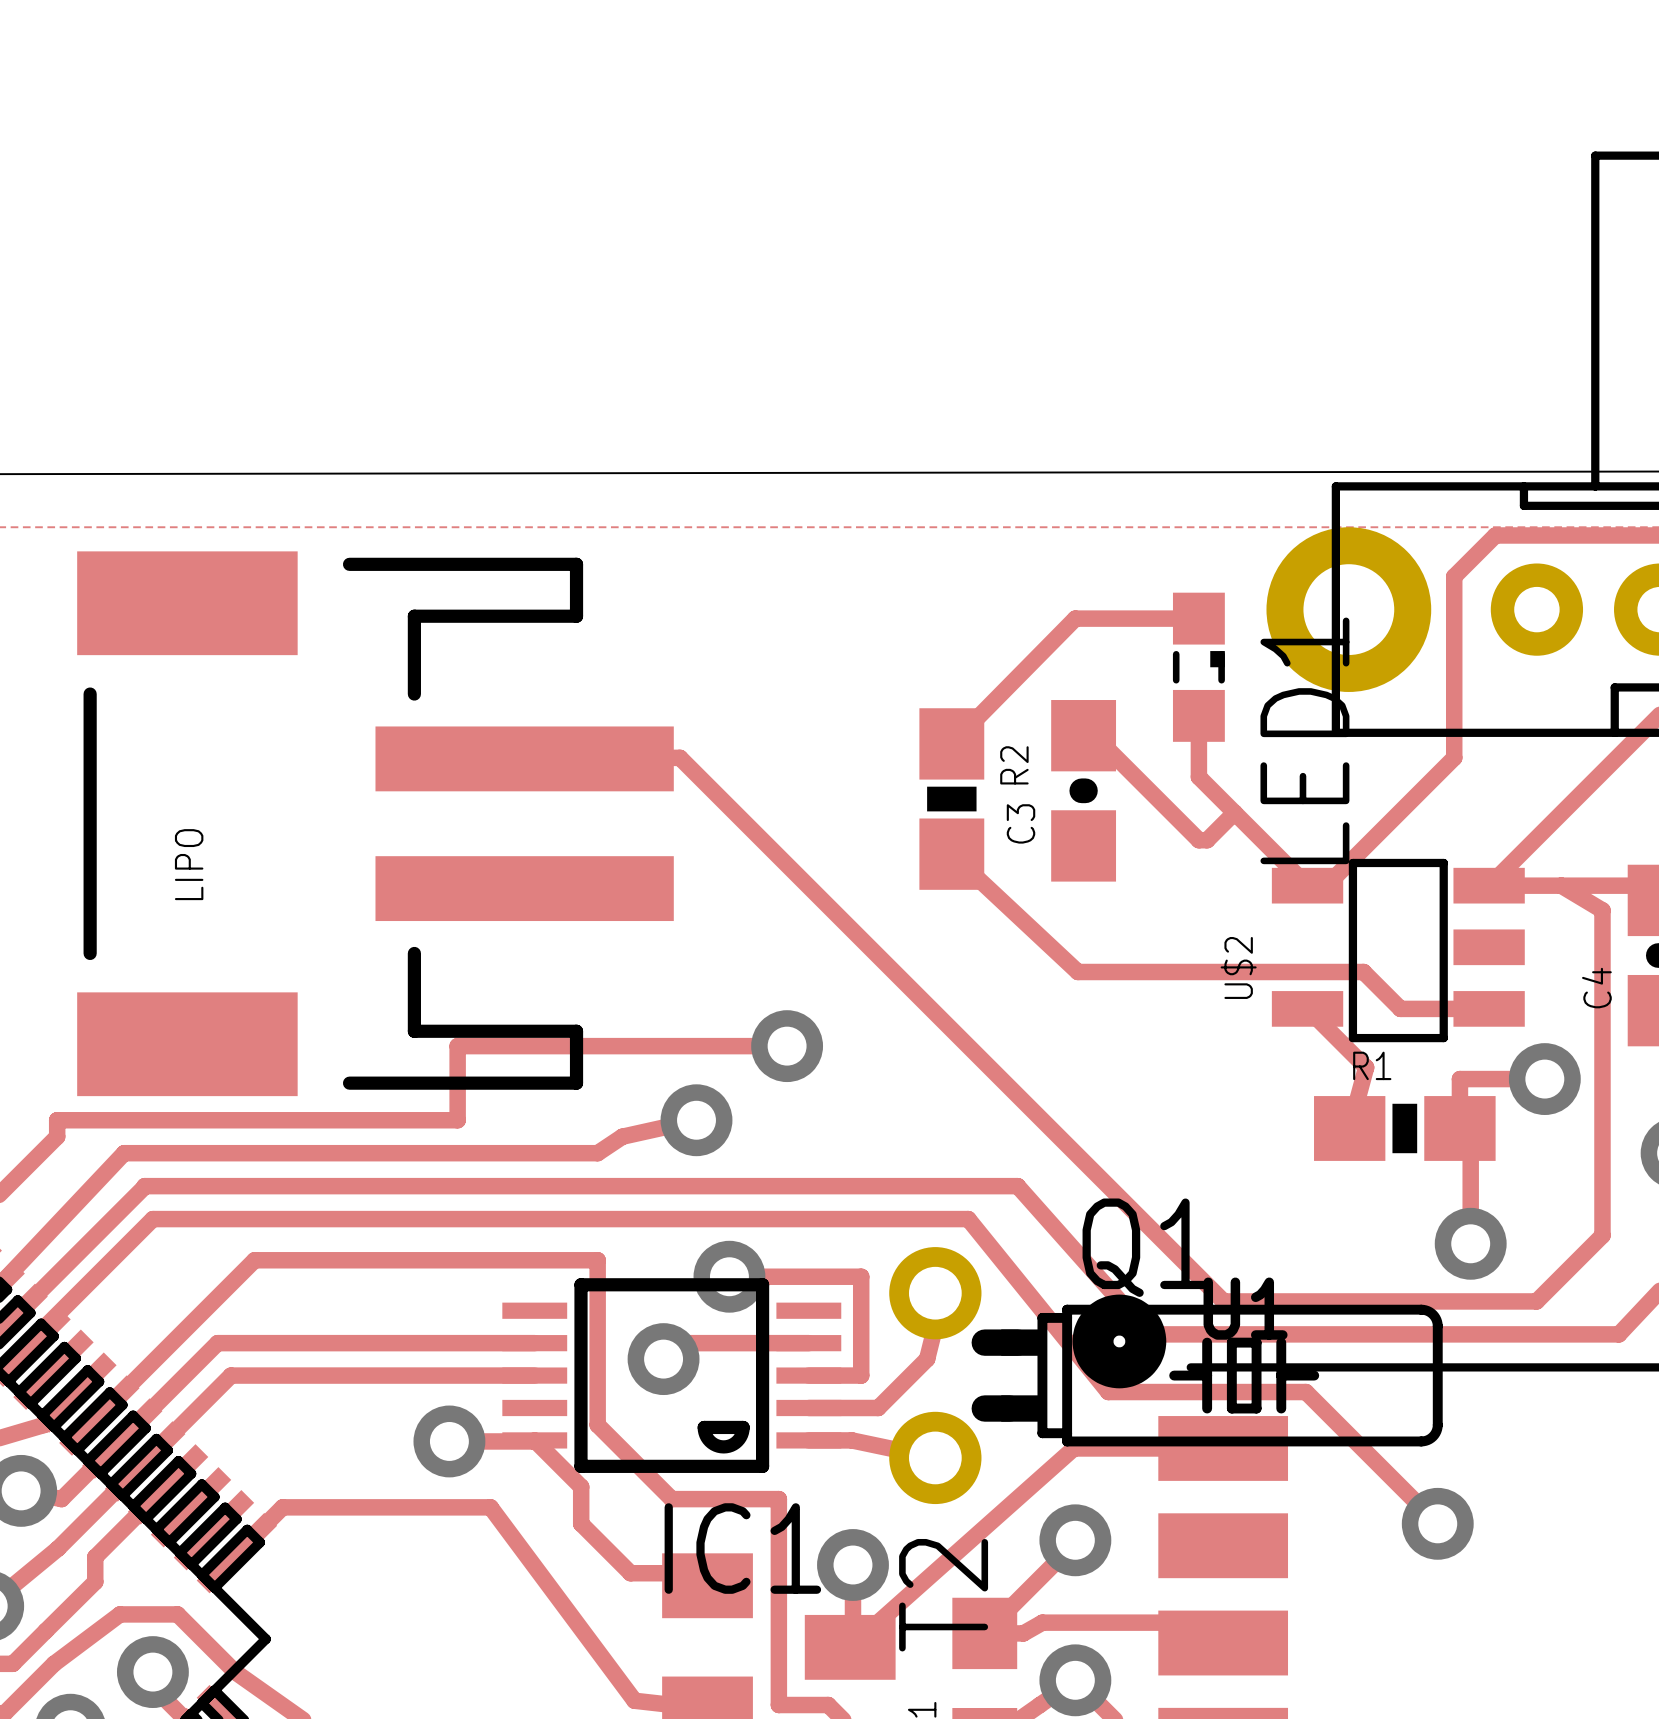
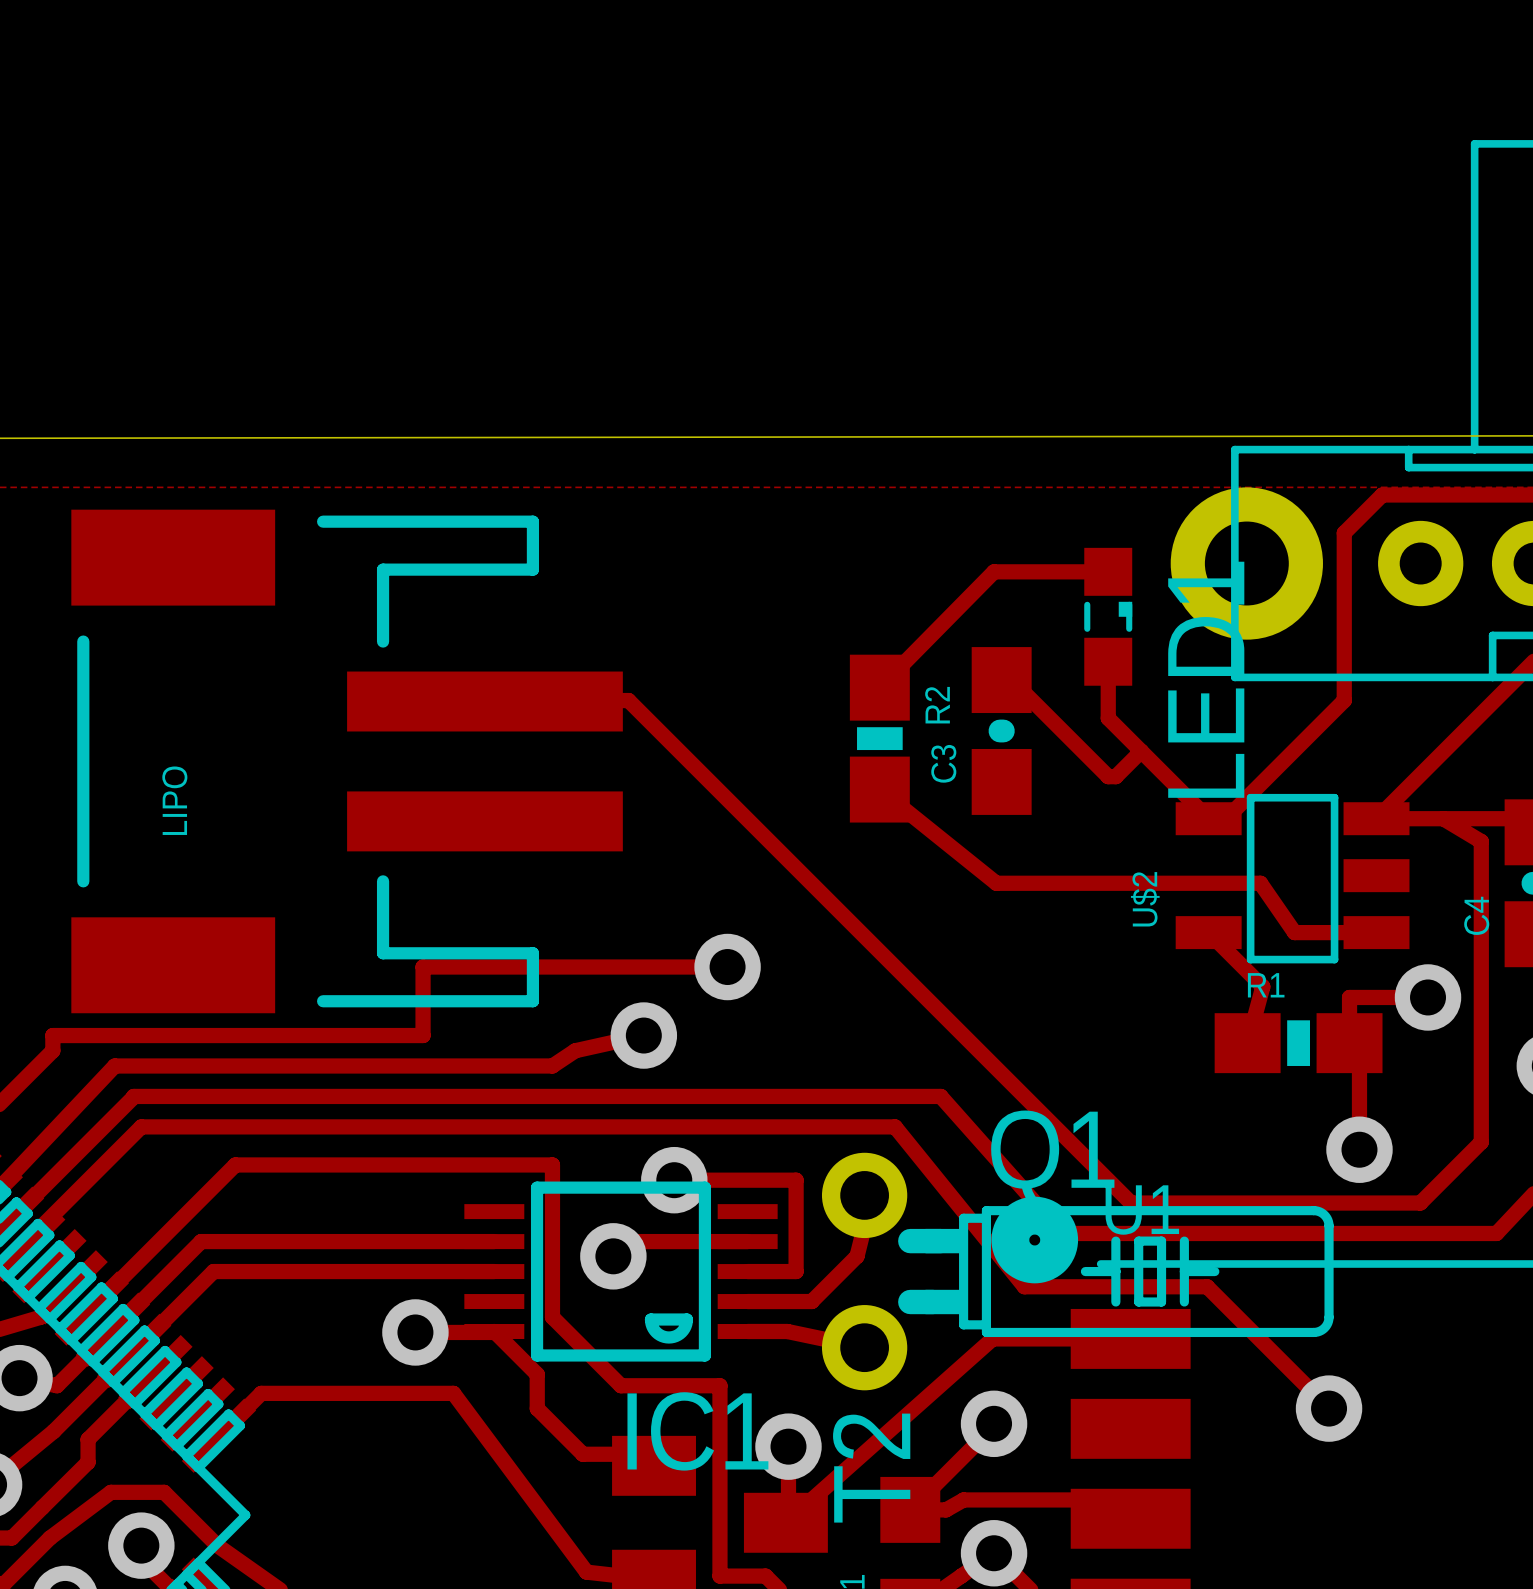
track: (951, 854) (1077, 972) (1363, 972) (1400, 1008) -> (879, 789) (996, 883) (1260, 883) (1294, 932)

